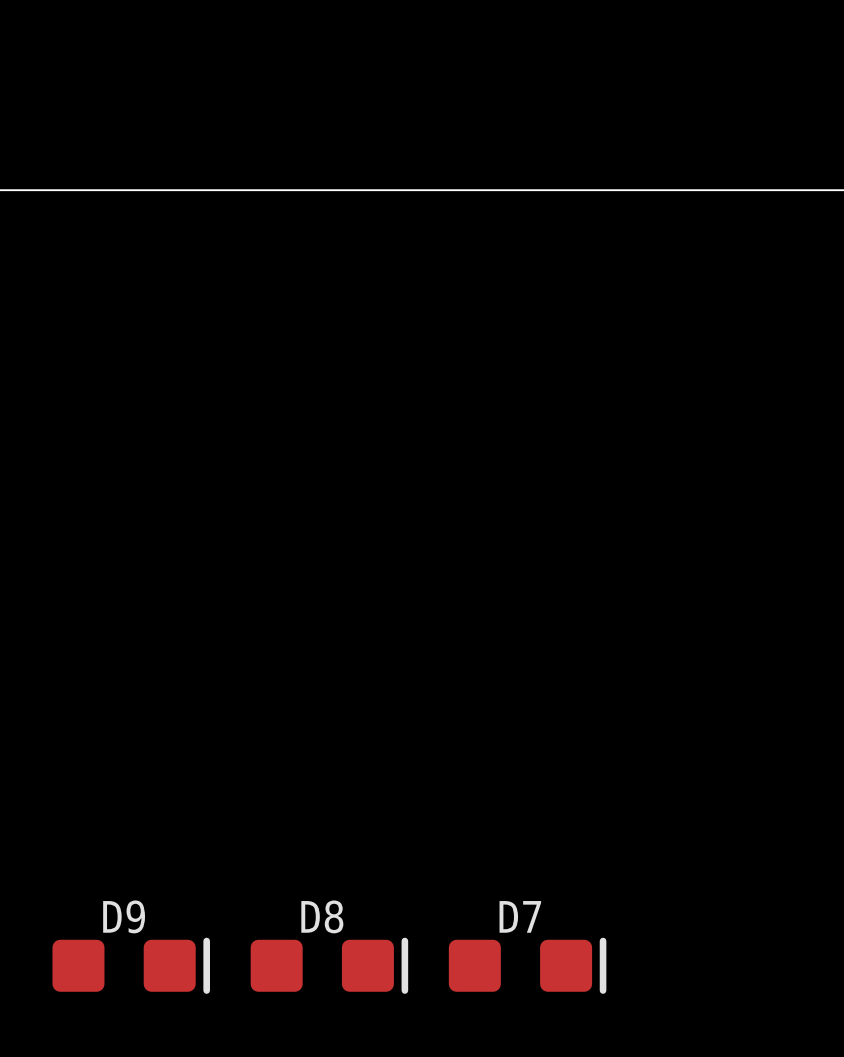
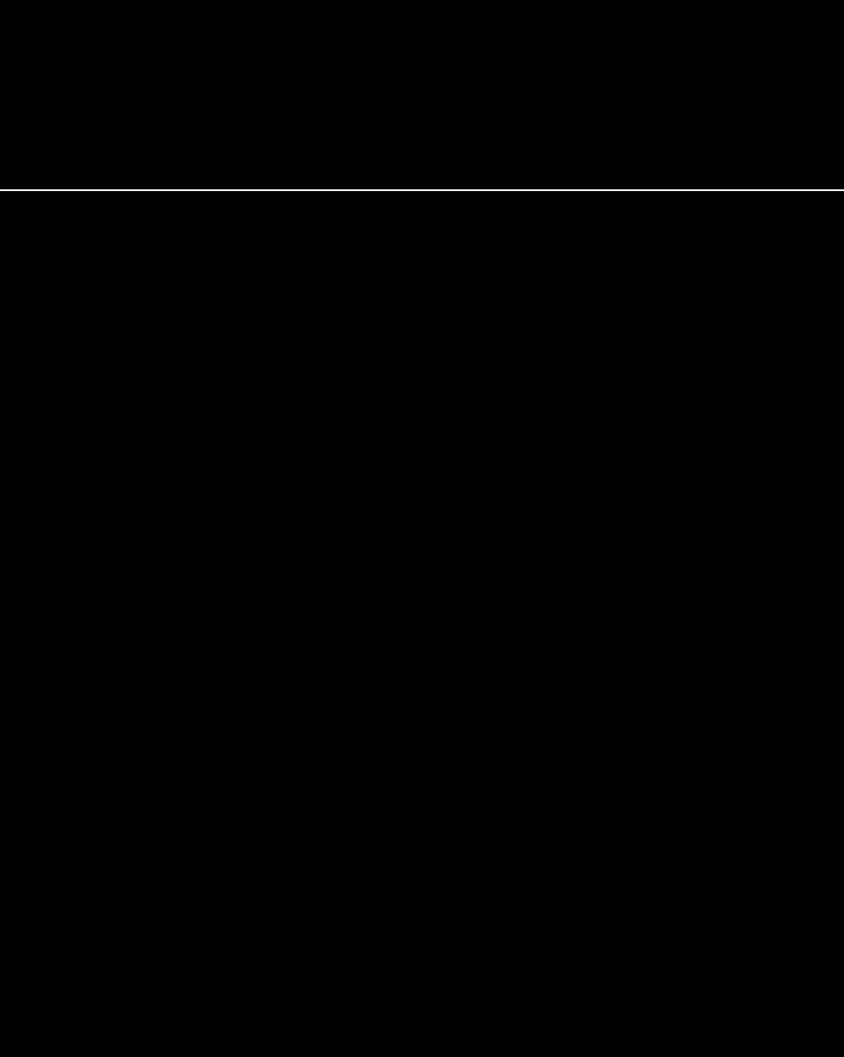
D9: (131, 965) -> none
D8: (329, 965) -> none
D7: (527, 965) -> none

